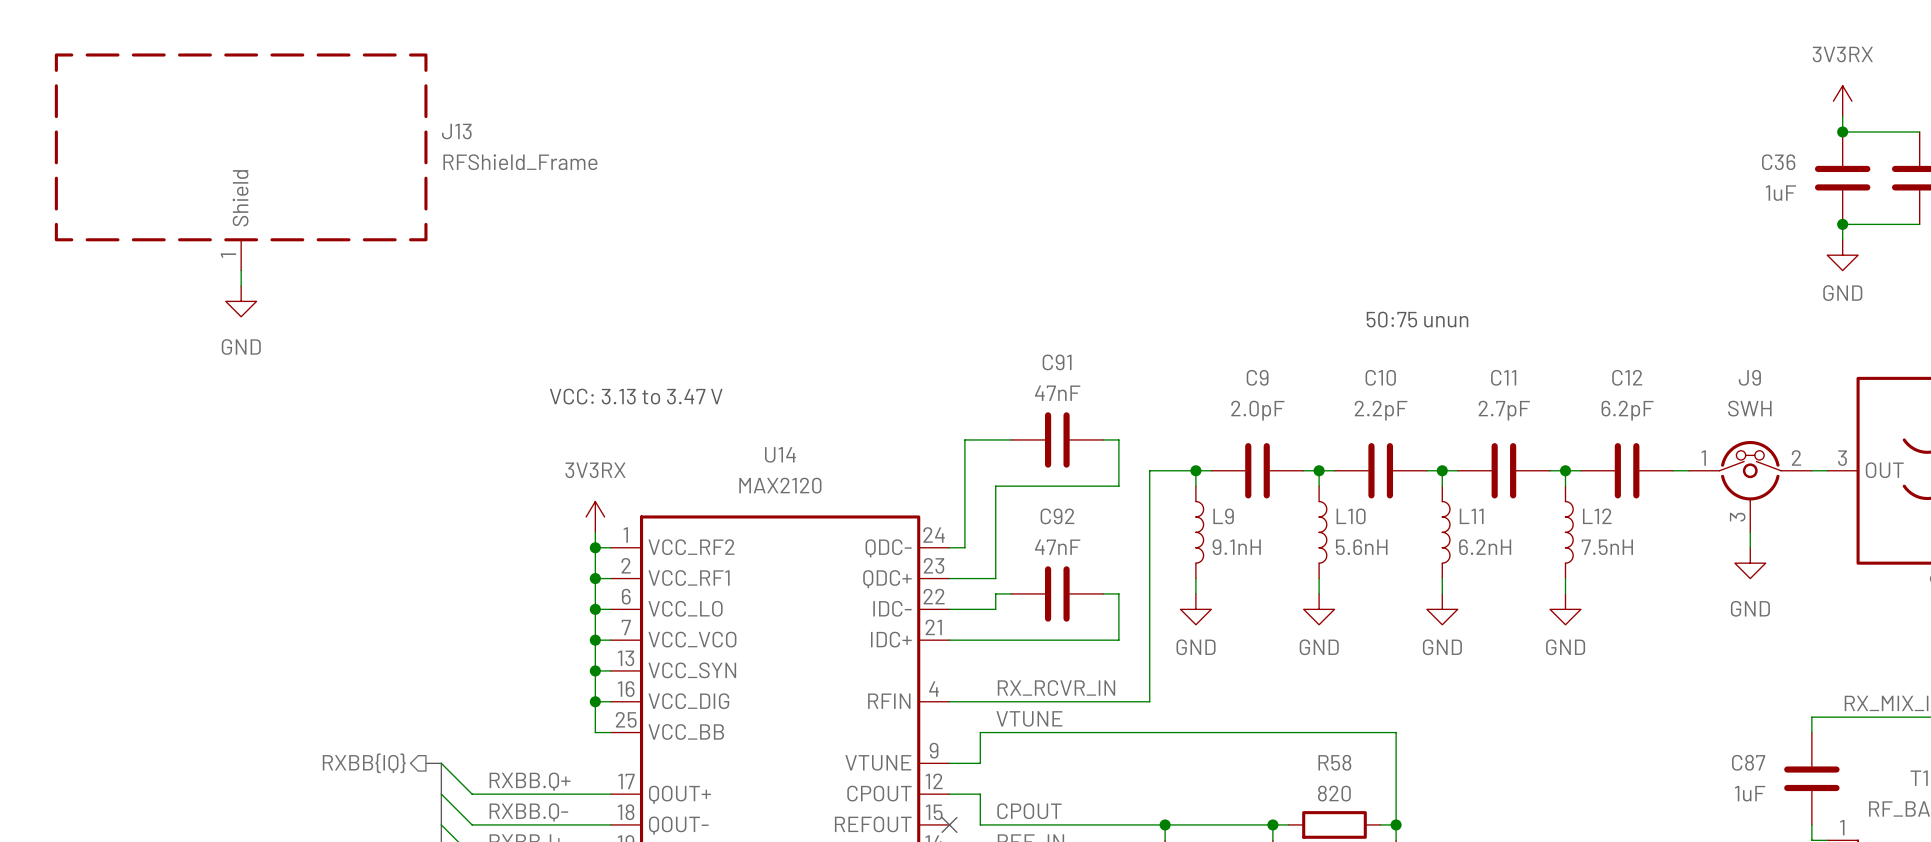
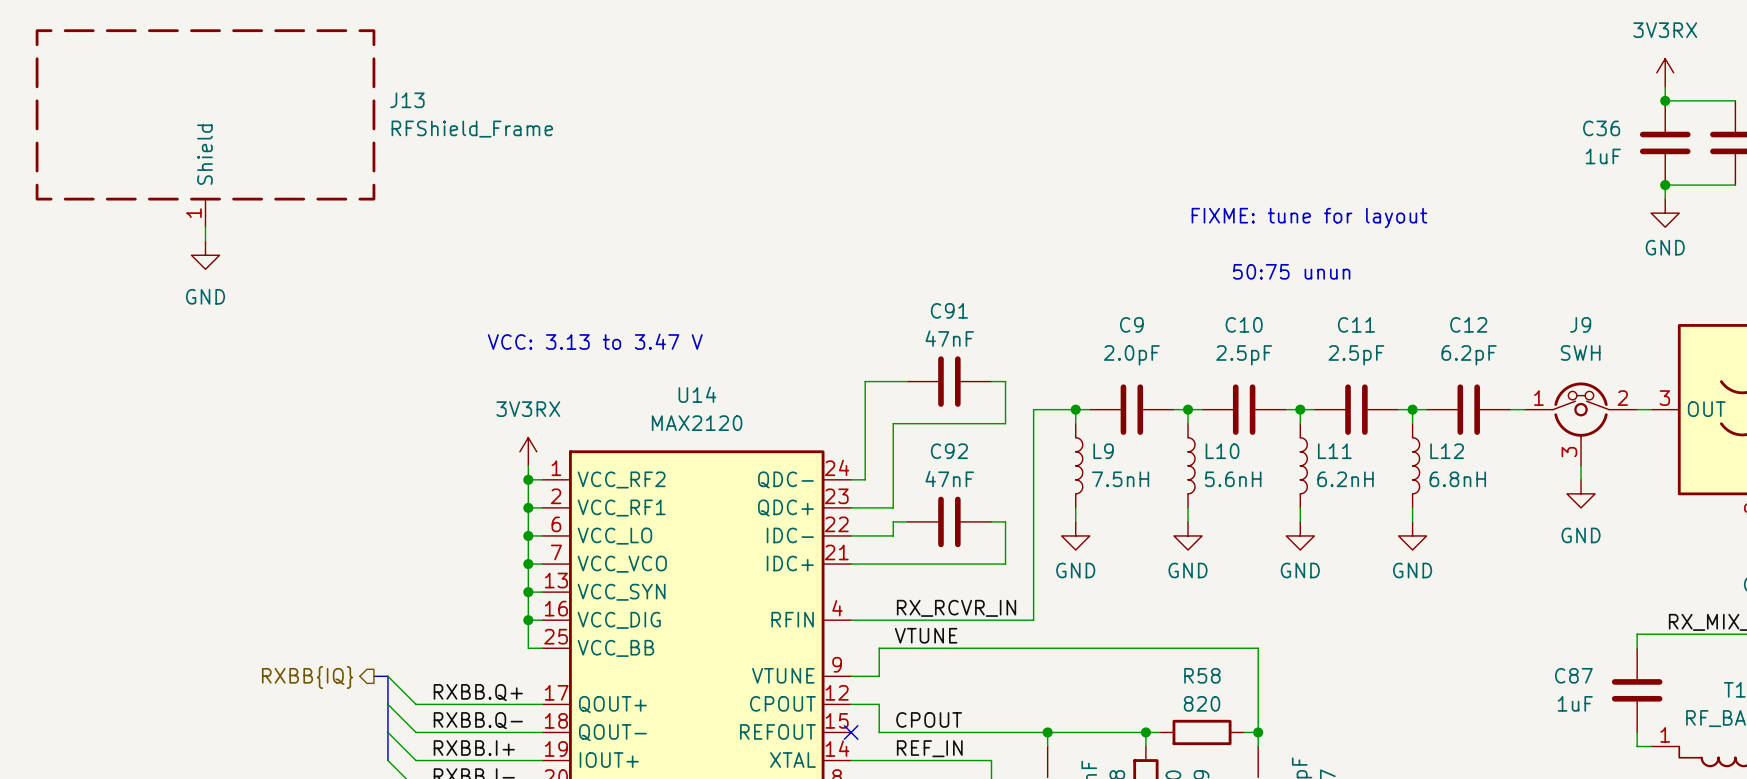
text: none -> FIXME: tune for layout (1309, 218)
C10 value: 2.2pF (1381, 410) -> 2.5pF (1244, 355)
C11 value: 2.7pF (1504, 410) -> 2.5pF (1356, 355)
L9 value: 9.1nH (1236, 547) -> 7.5nH (1120, 479)
L12 value: 7.5nH (1607, 547) -> 6.8nH (1457, 479)

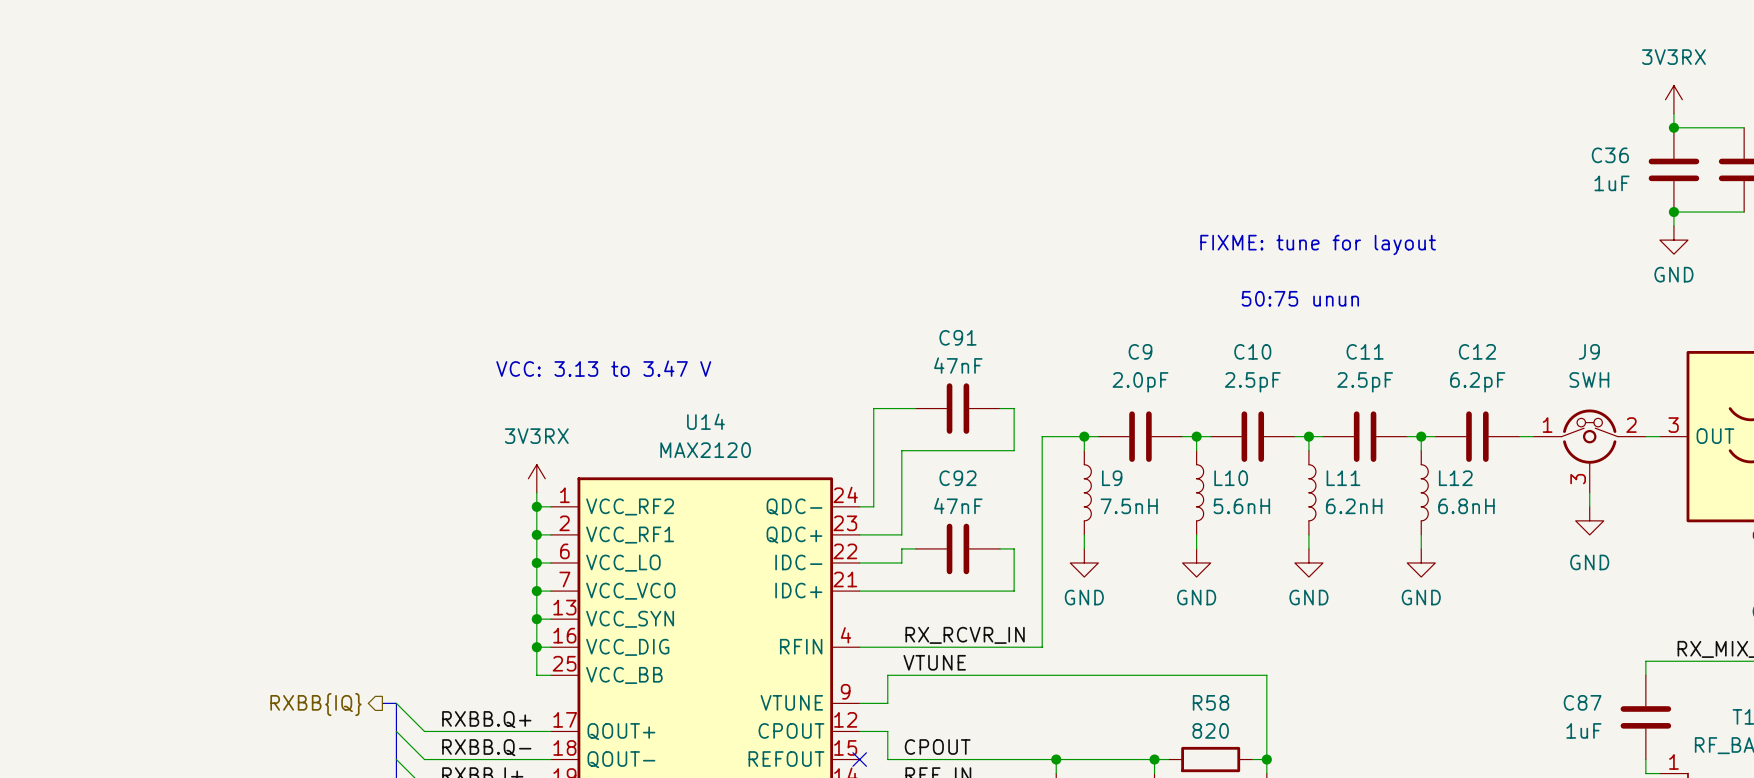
J13: RFShield_Frame (205, 128) -> none
wire: (205, 227) (205, 241) -> none
power symbol: GND (205, 255) -> none

